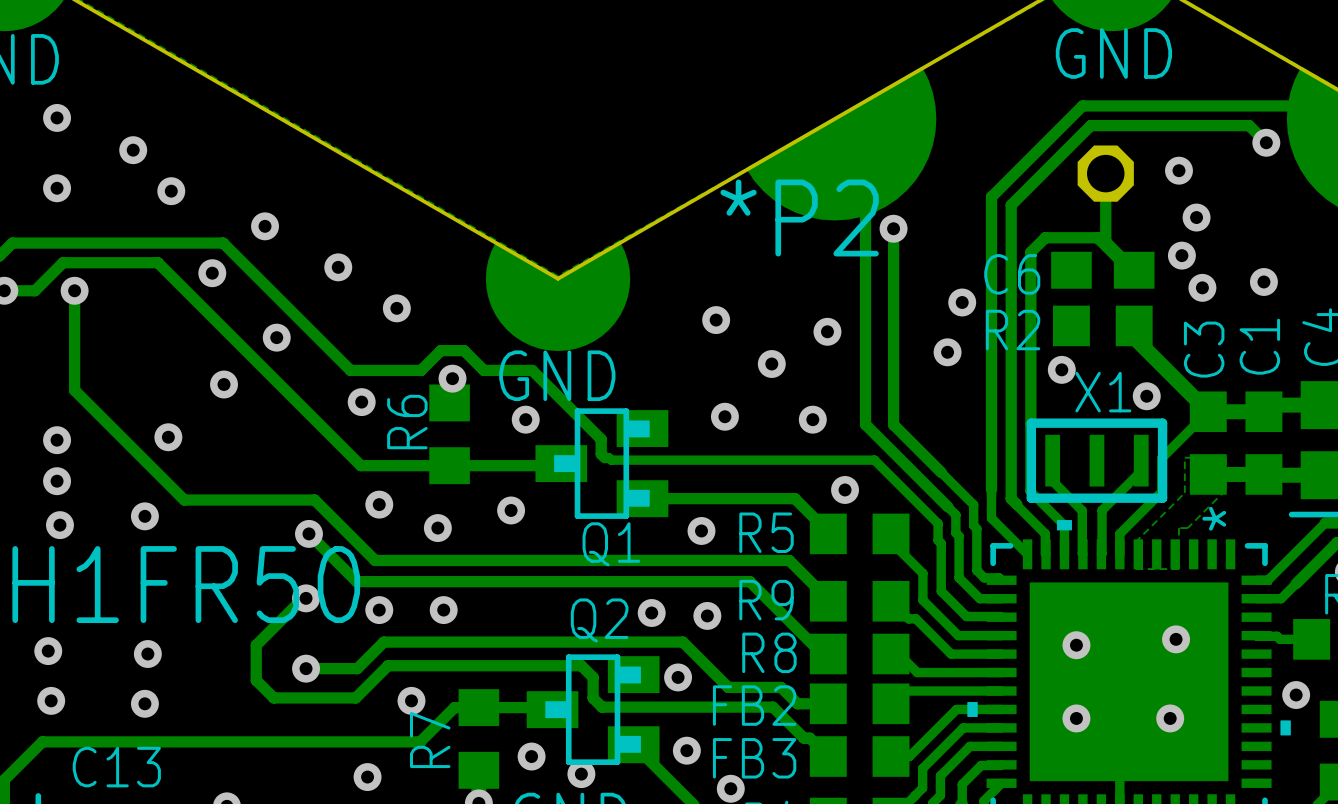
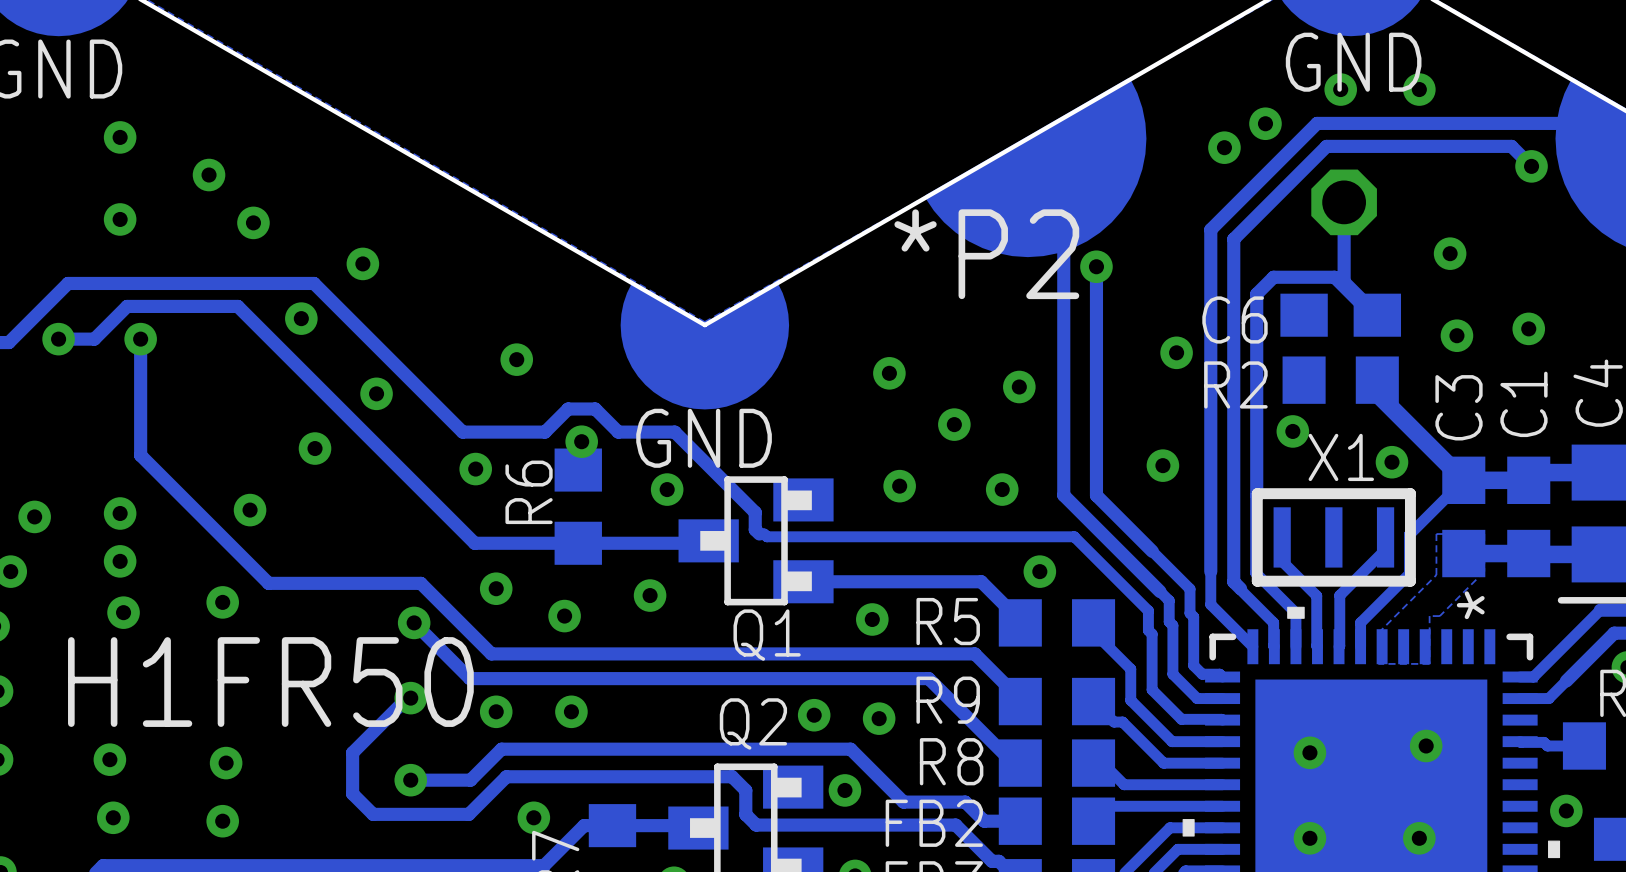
via: none -> (1340, 89)
via: none -> (1419, 89)
via: none -> (1265, 123)
via: none -> (1224, 147)
via: (1178, 170) -> none
via: (1181, 255) -> none
via: (338, 267) -> none
via position: (947, 352) -> (1162, 465)

